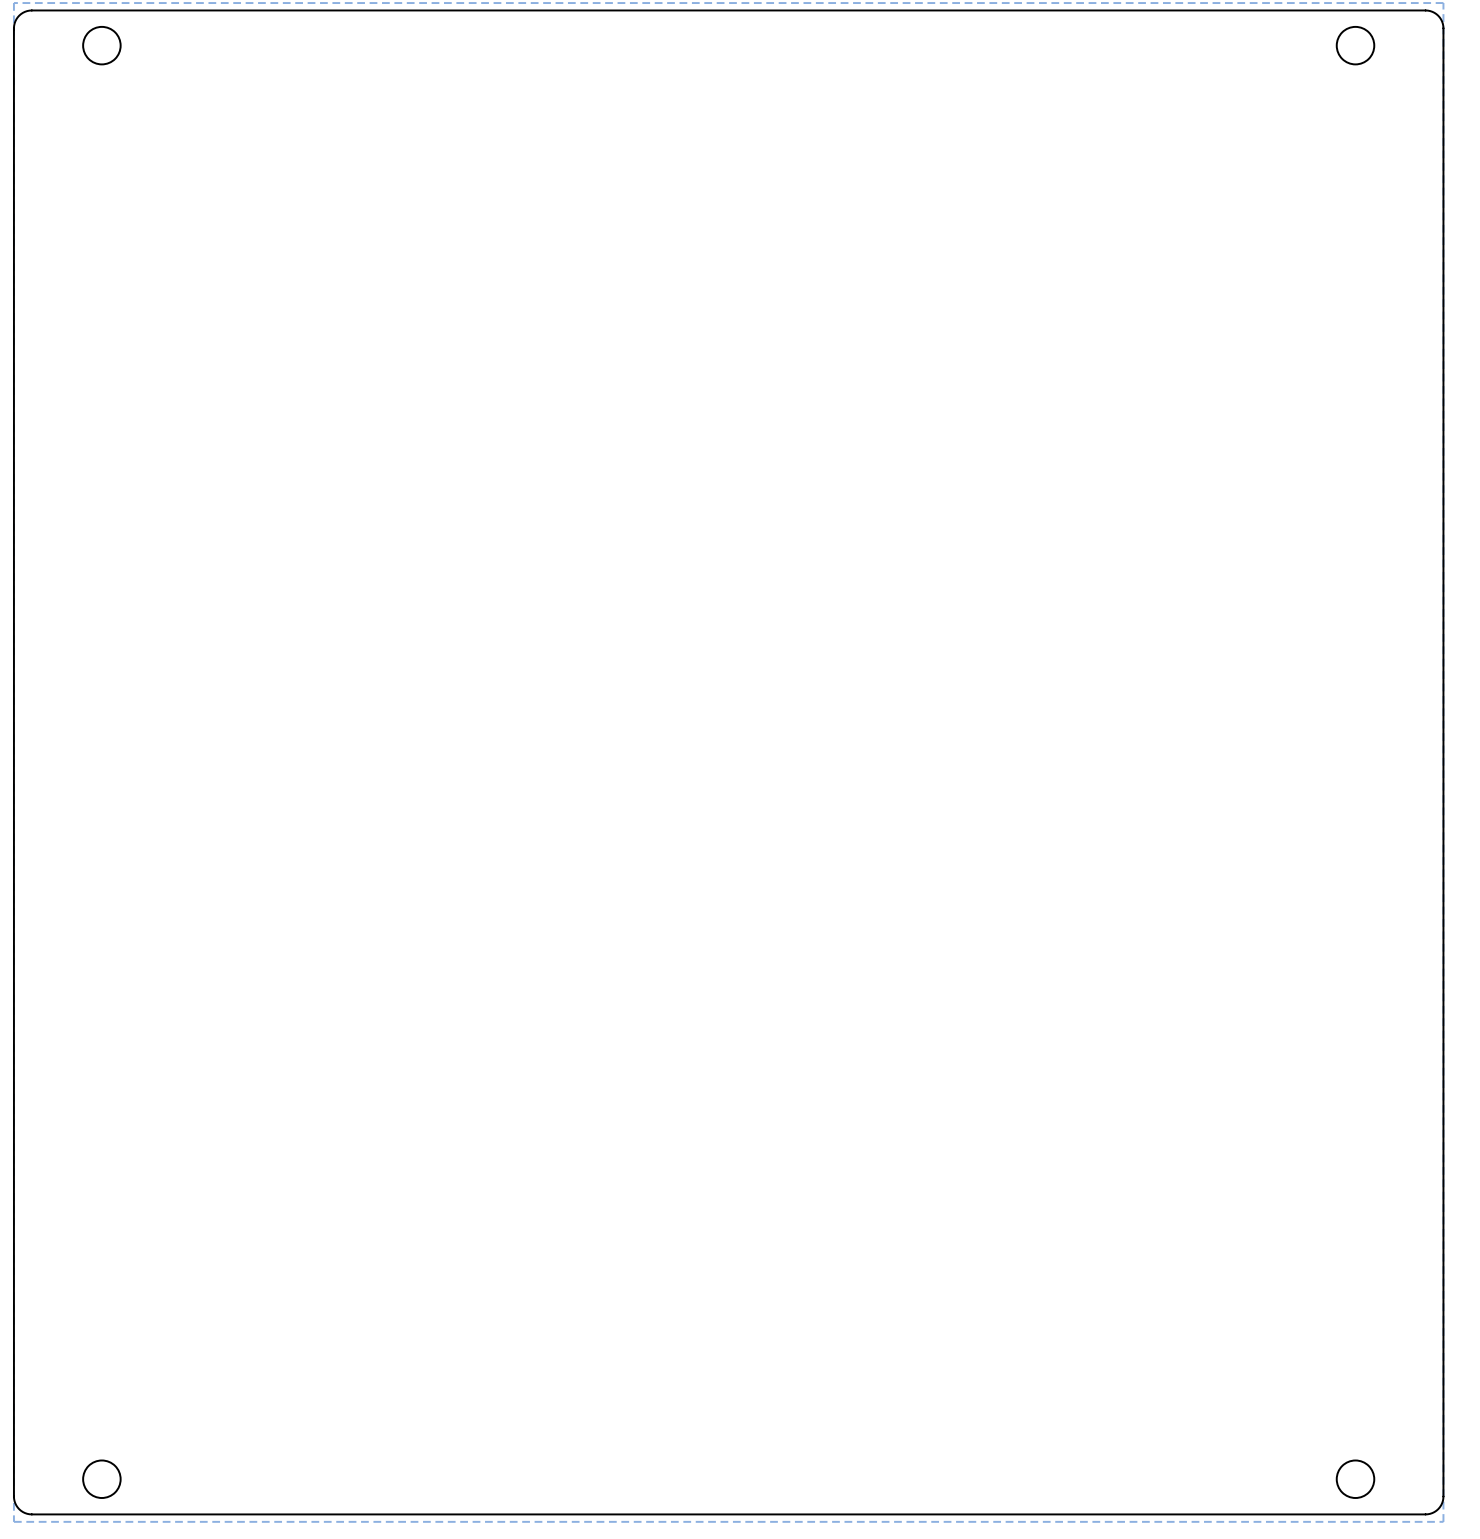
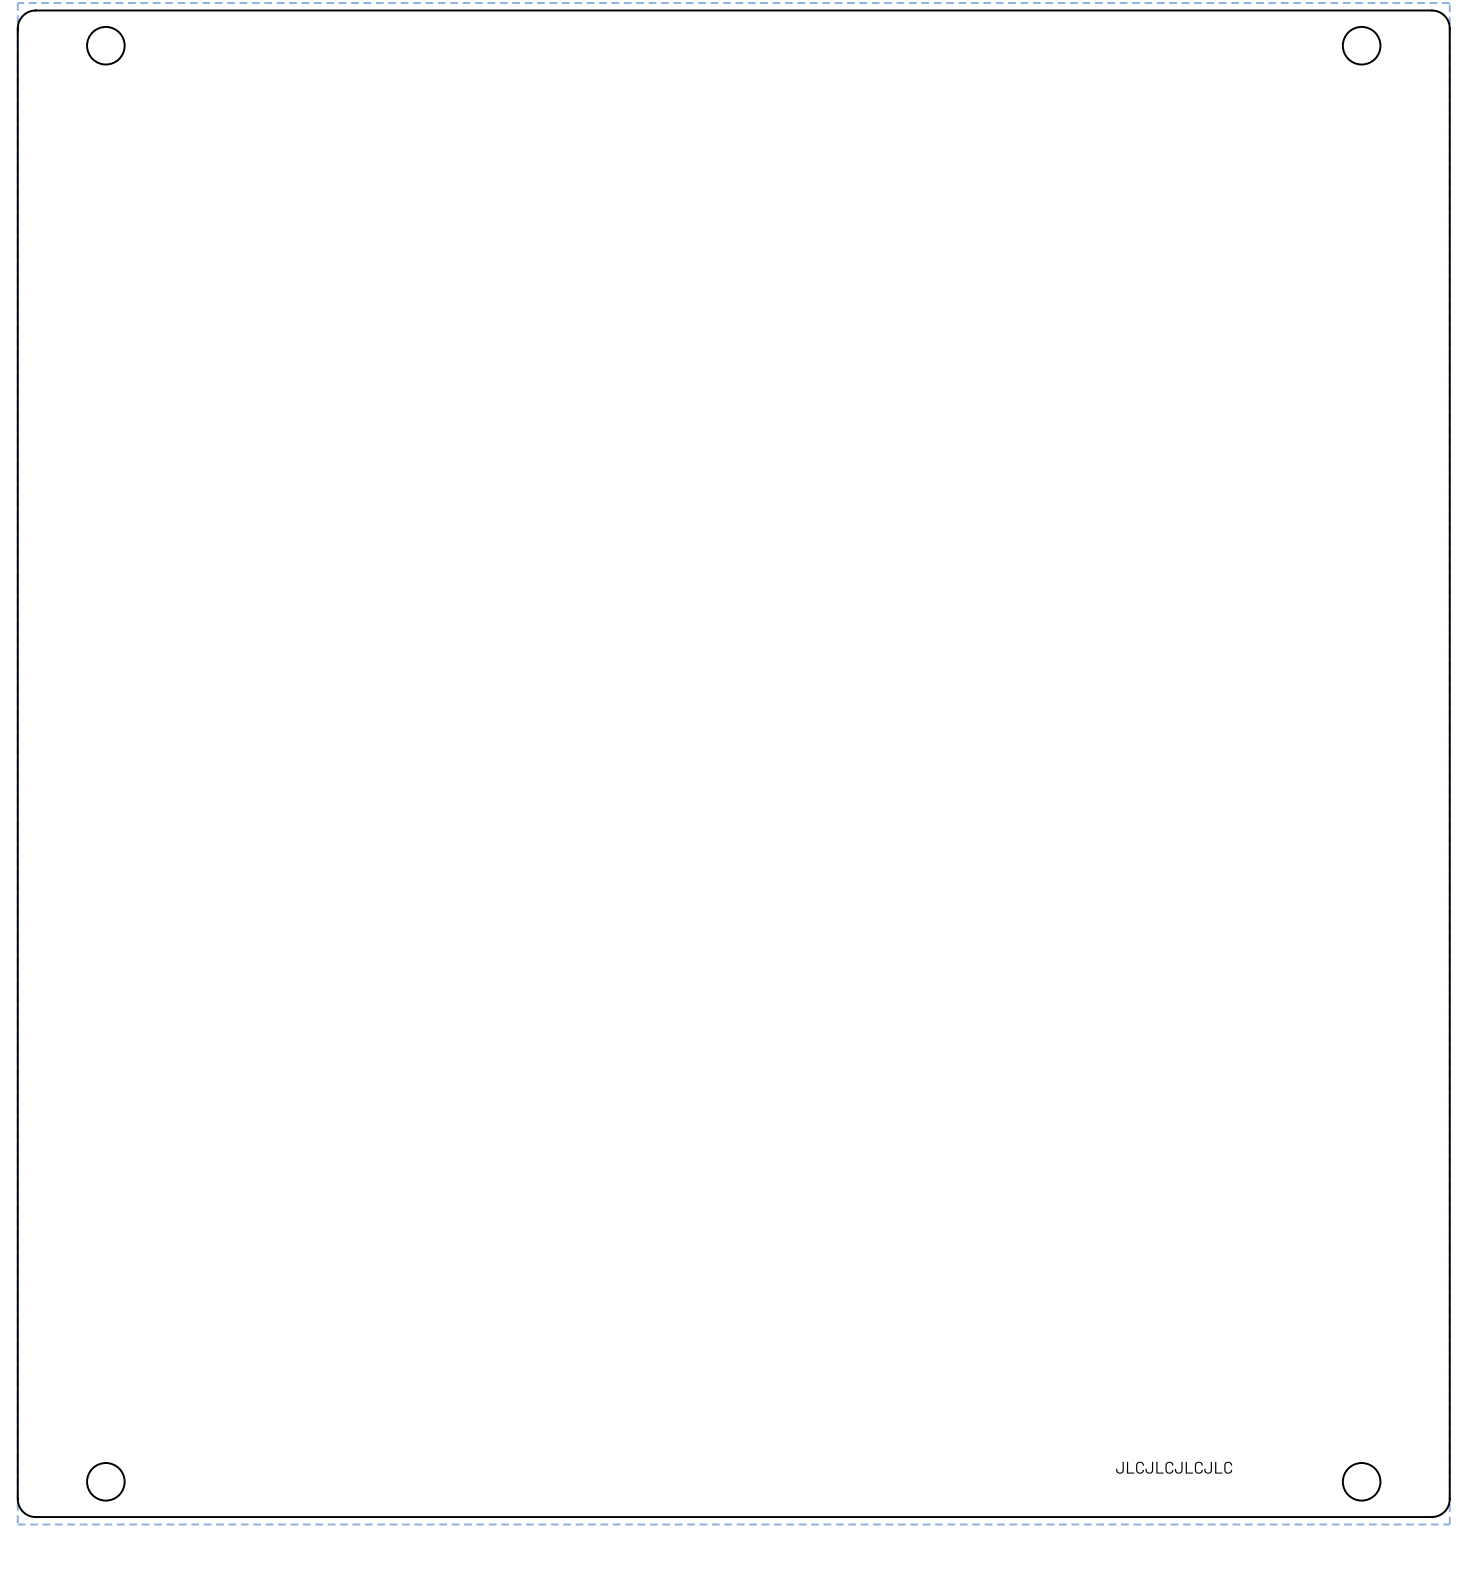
text: none -> JLCJLCJLCJLC (1174, 1467)

